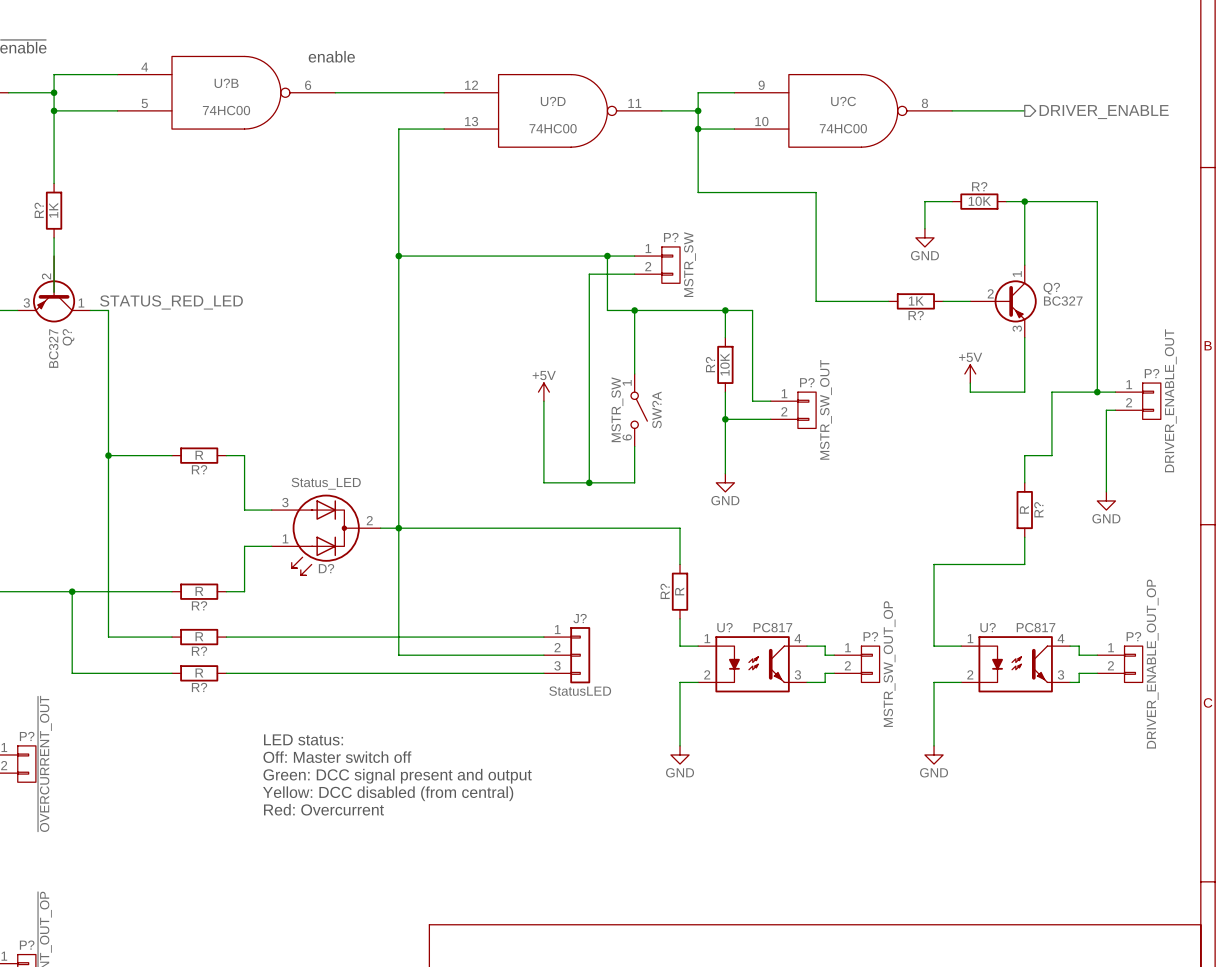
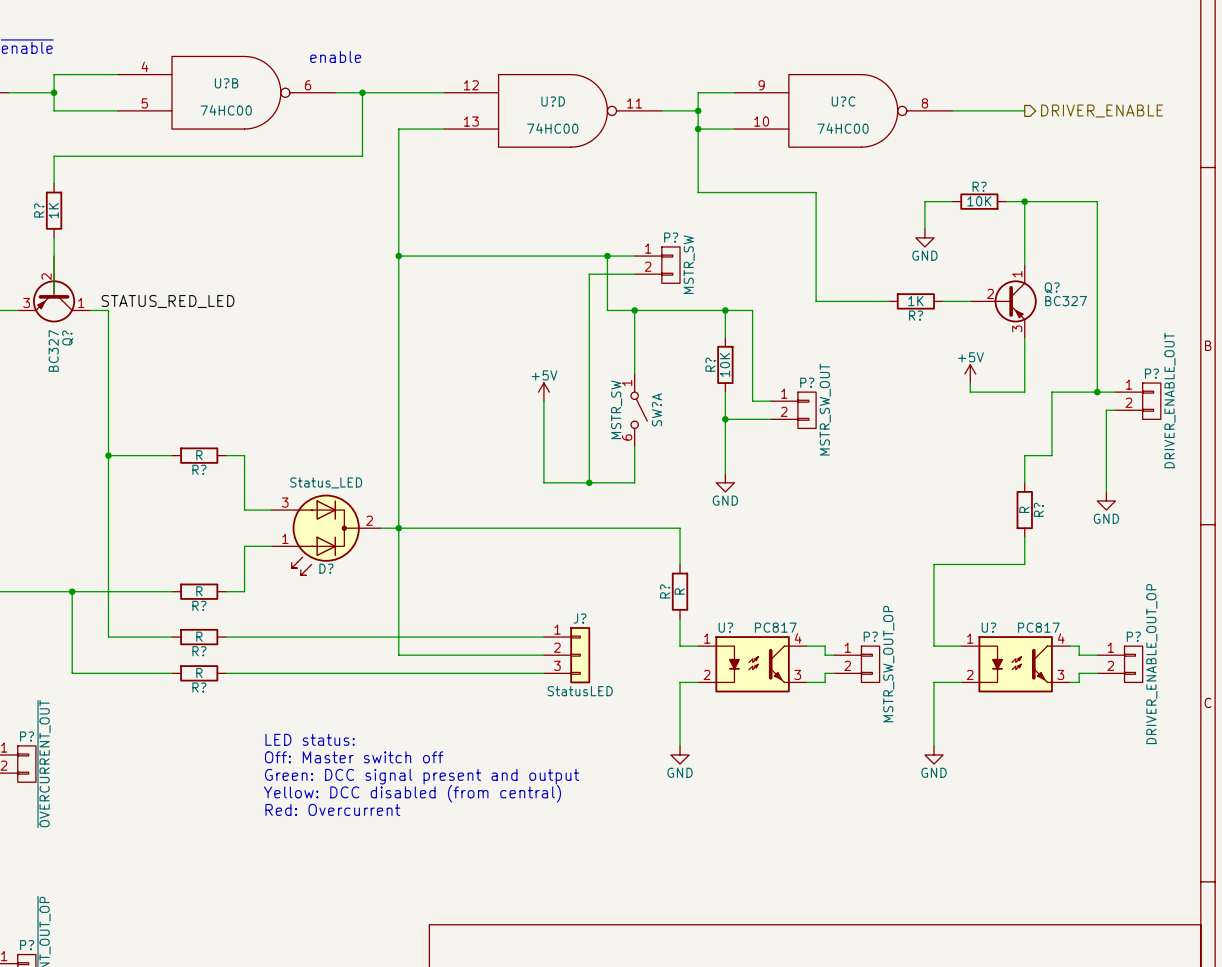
junction: none -> (362, 92)
wire: (54, 110) (54, 156) -> (362, 92) (362, 156) (54, 156)
junction: (54, 110) -> none

